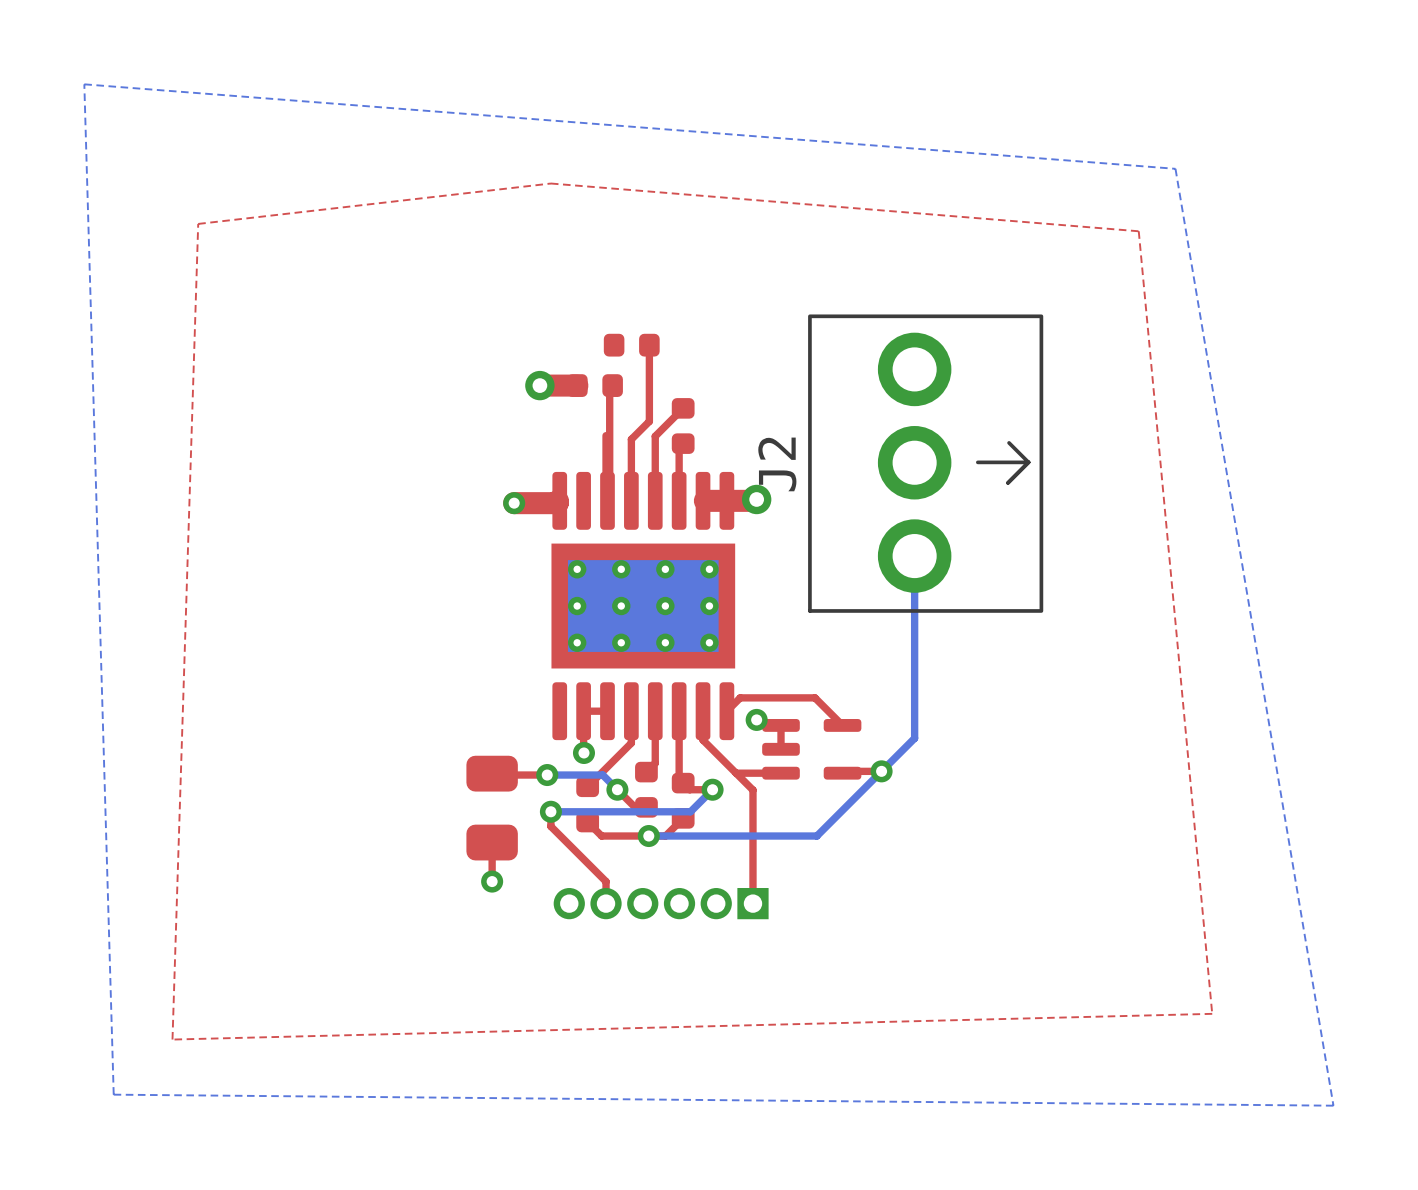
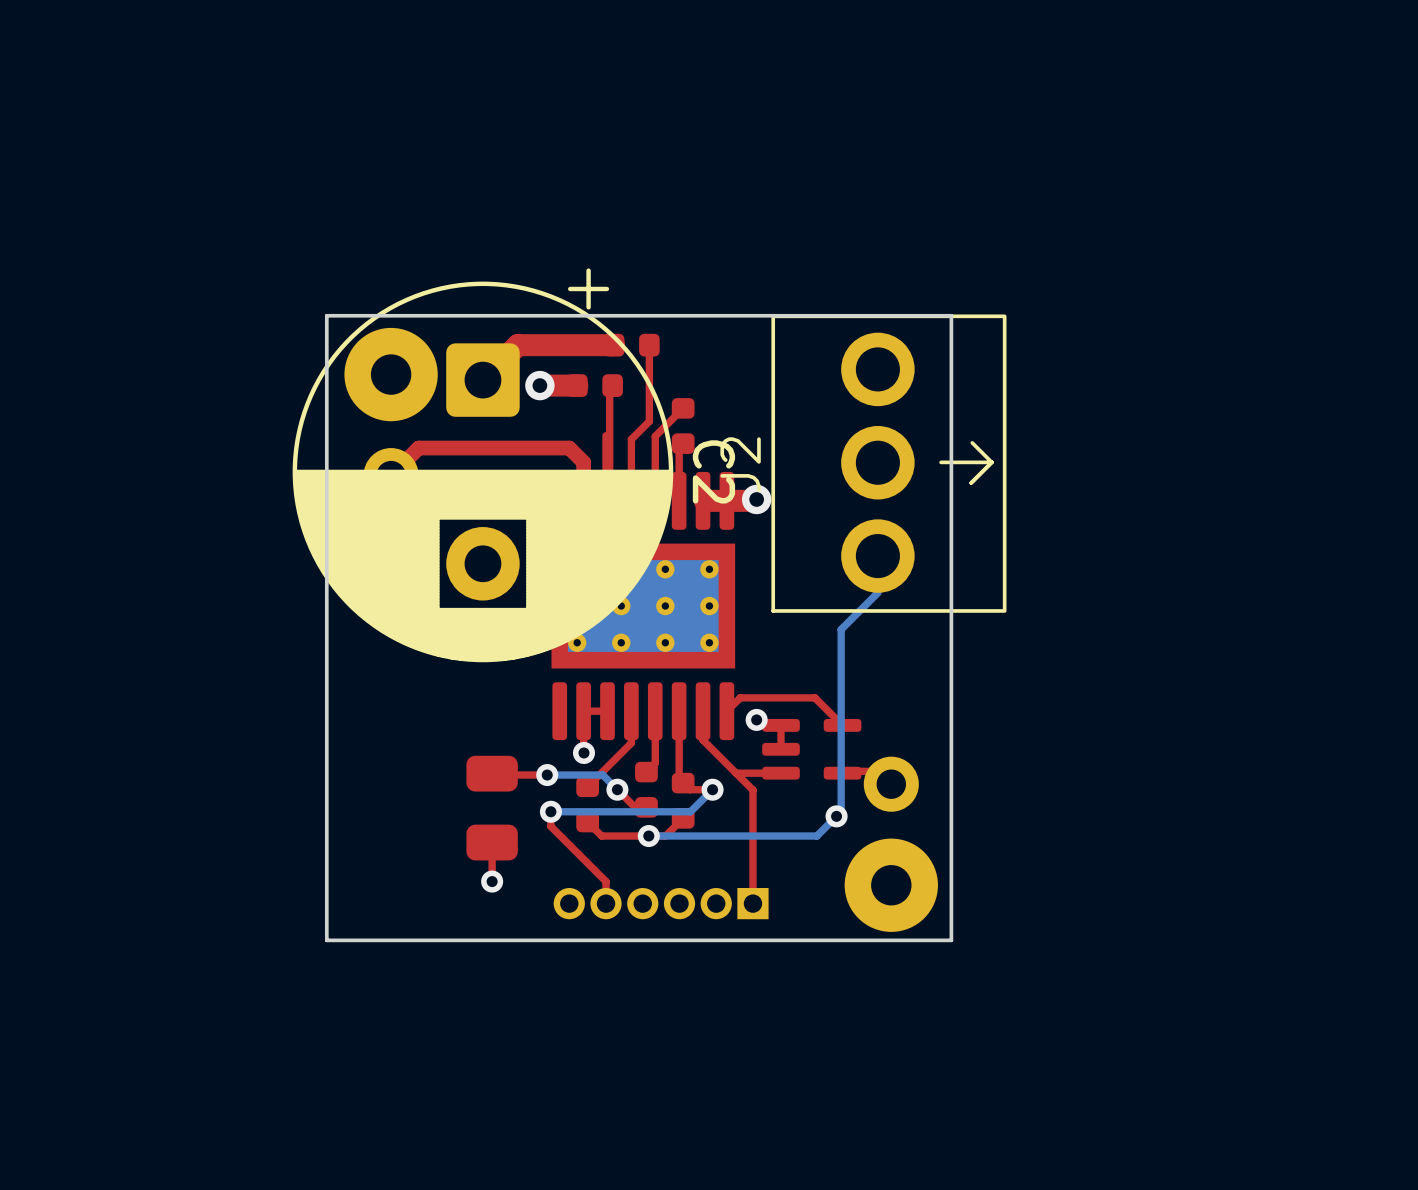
bottom zone outline: (84, 84) (113, 1094) (1333, 1105) (1175, 168) (84, 84) -> none
top zone outline: (550, 183) (198, 223) (172, 1039) (1212, 1013) (1138, 231) (550, 183) -> none
board edge: none -> (951, 315) (326, 315) (326, 940) (951, 940) (951, 315)
top track: none -> (614, 345) (517, 345) (482, 380)
part: none -> (391, 415)
J2 position: (925, 463) -> (888, 463)
C2: none -> (482, 465)
top track: none -> (391, 475) (418, 448) (569, 448) (583, 462) (583, 500)
bottom track: (914, 556) (914, 738) (841, 811) -> (877, 592) (841, 629) (841, 811)
via position: (881, 771) -> (836, 816)
part: none -> (891, 844)

